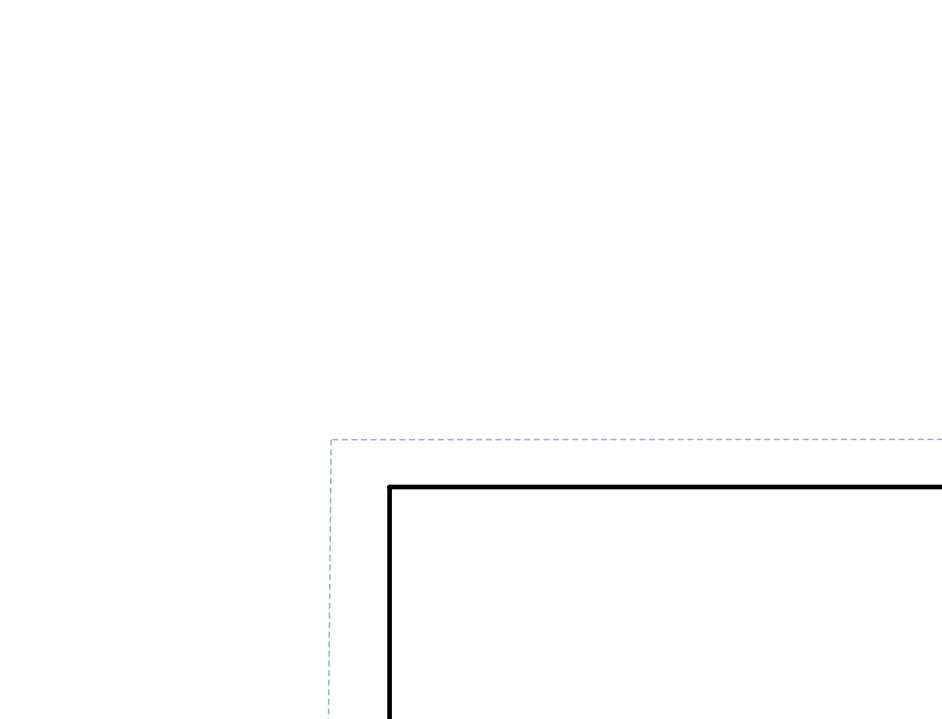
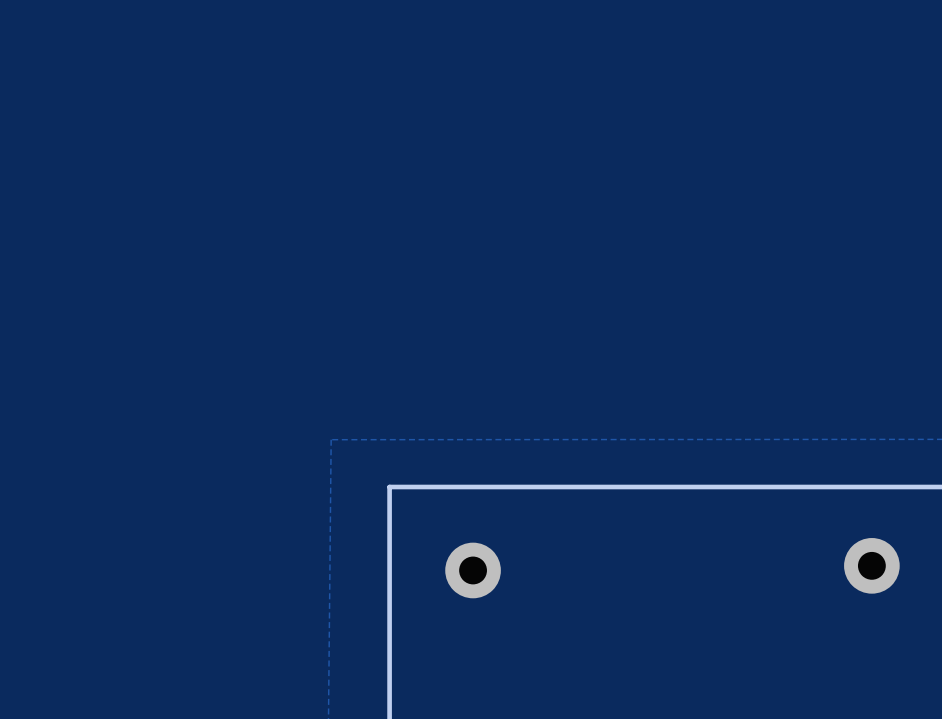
via: none -> (871, 565)
via: none -> (473, 570)

